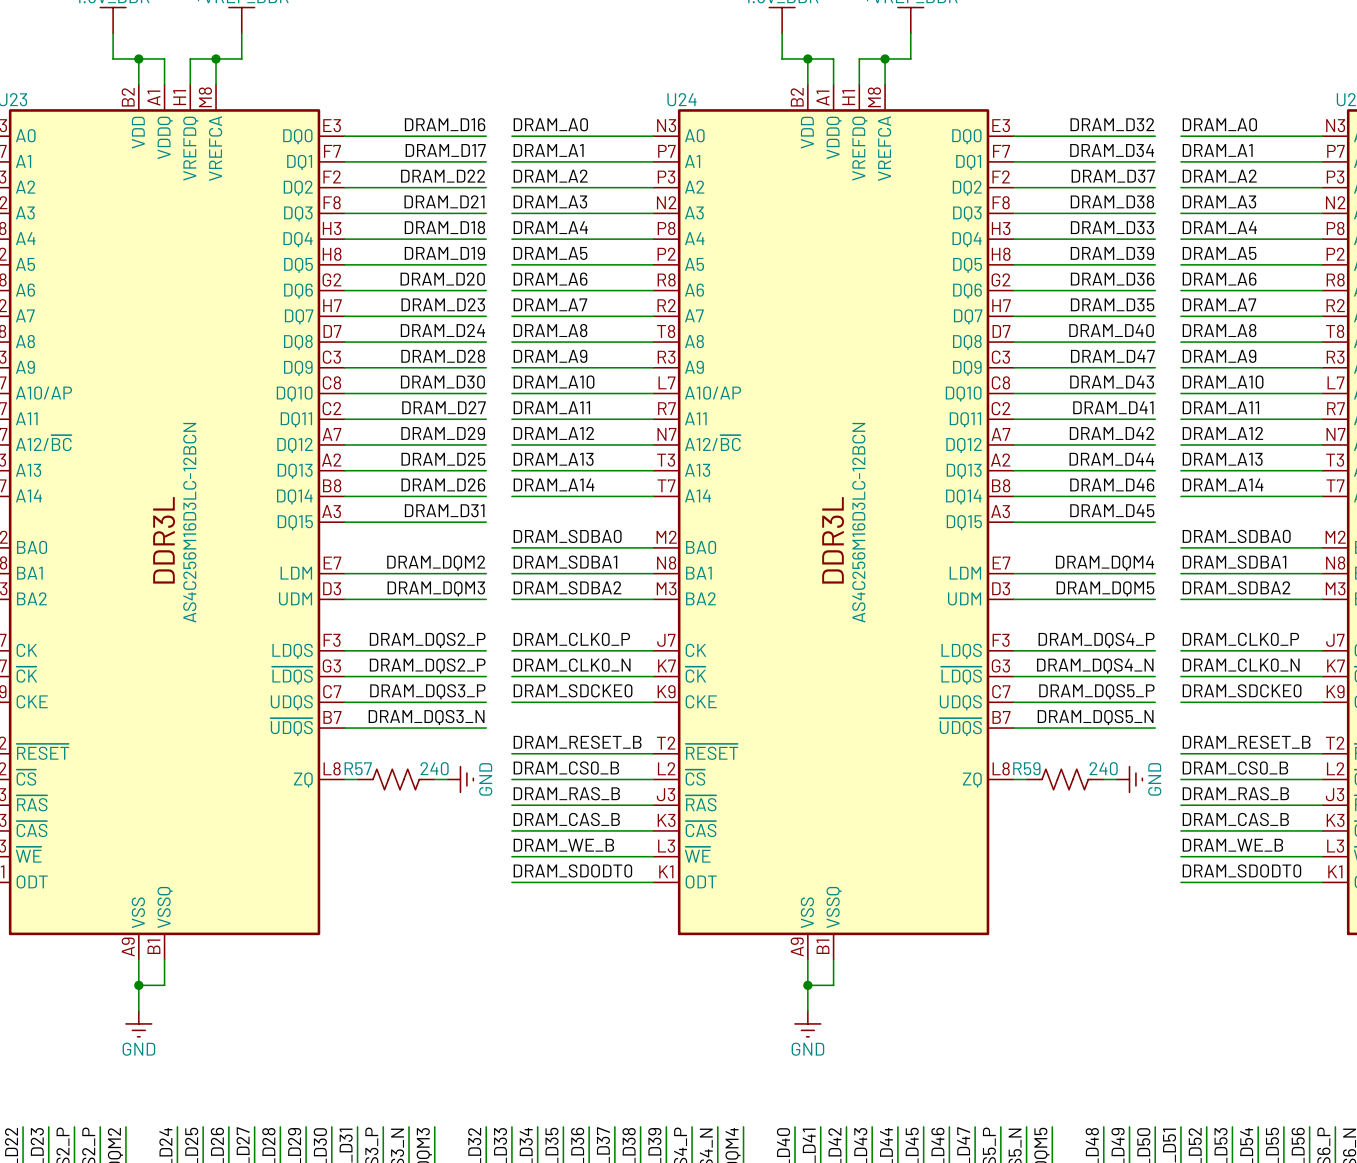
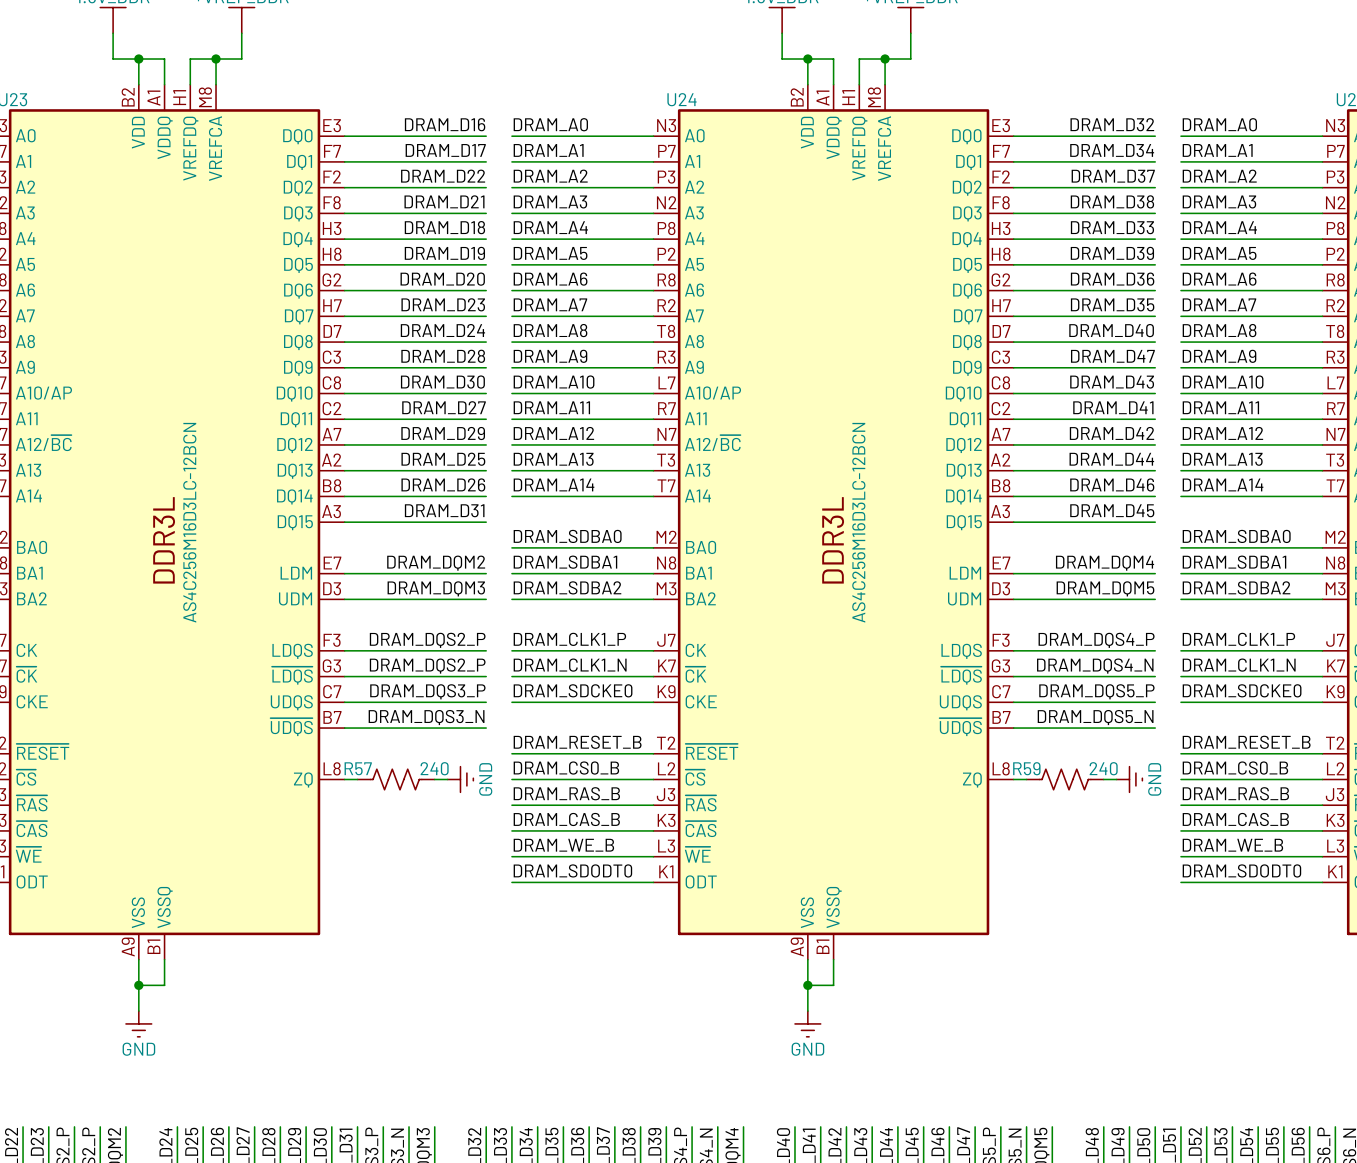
label: DRAM_CLK0_P (571, 639) -> DRAM_CLK1_P (569, 639)
label: DRAM_CLK0_P (1240, 639) -> DRAM_CLK1_P (1238, 639)
label: DRAM_CLK0_N (572, 665) -> DRAM_CLK1_N (570, 665)
label: DRAM_CLK0_N (1241, 665) -> DRAM_CLK1_N (1239, 665)

